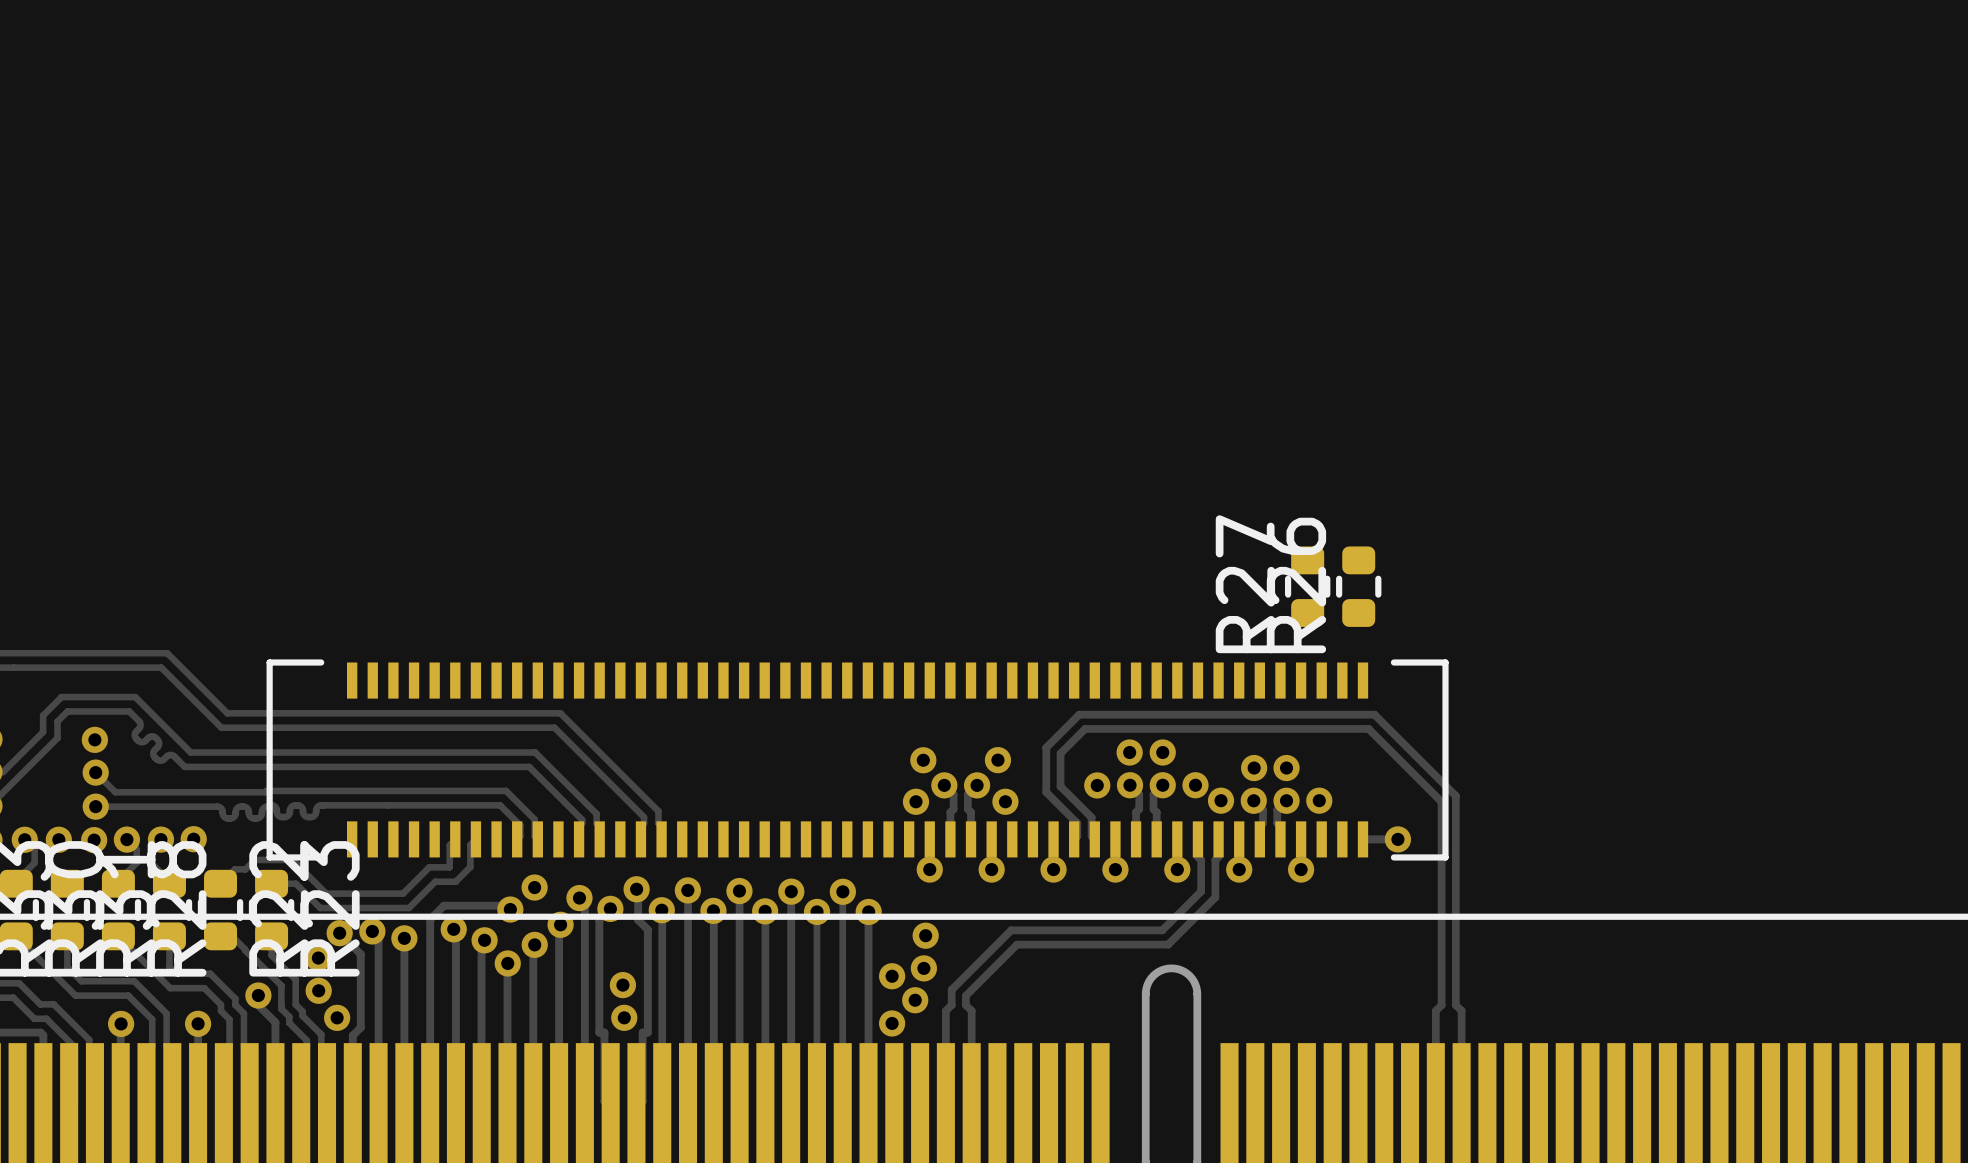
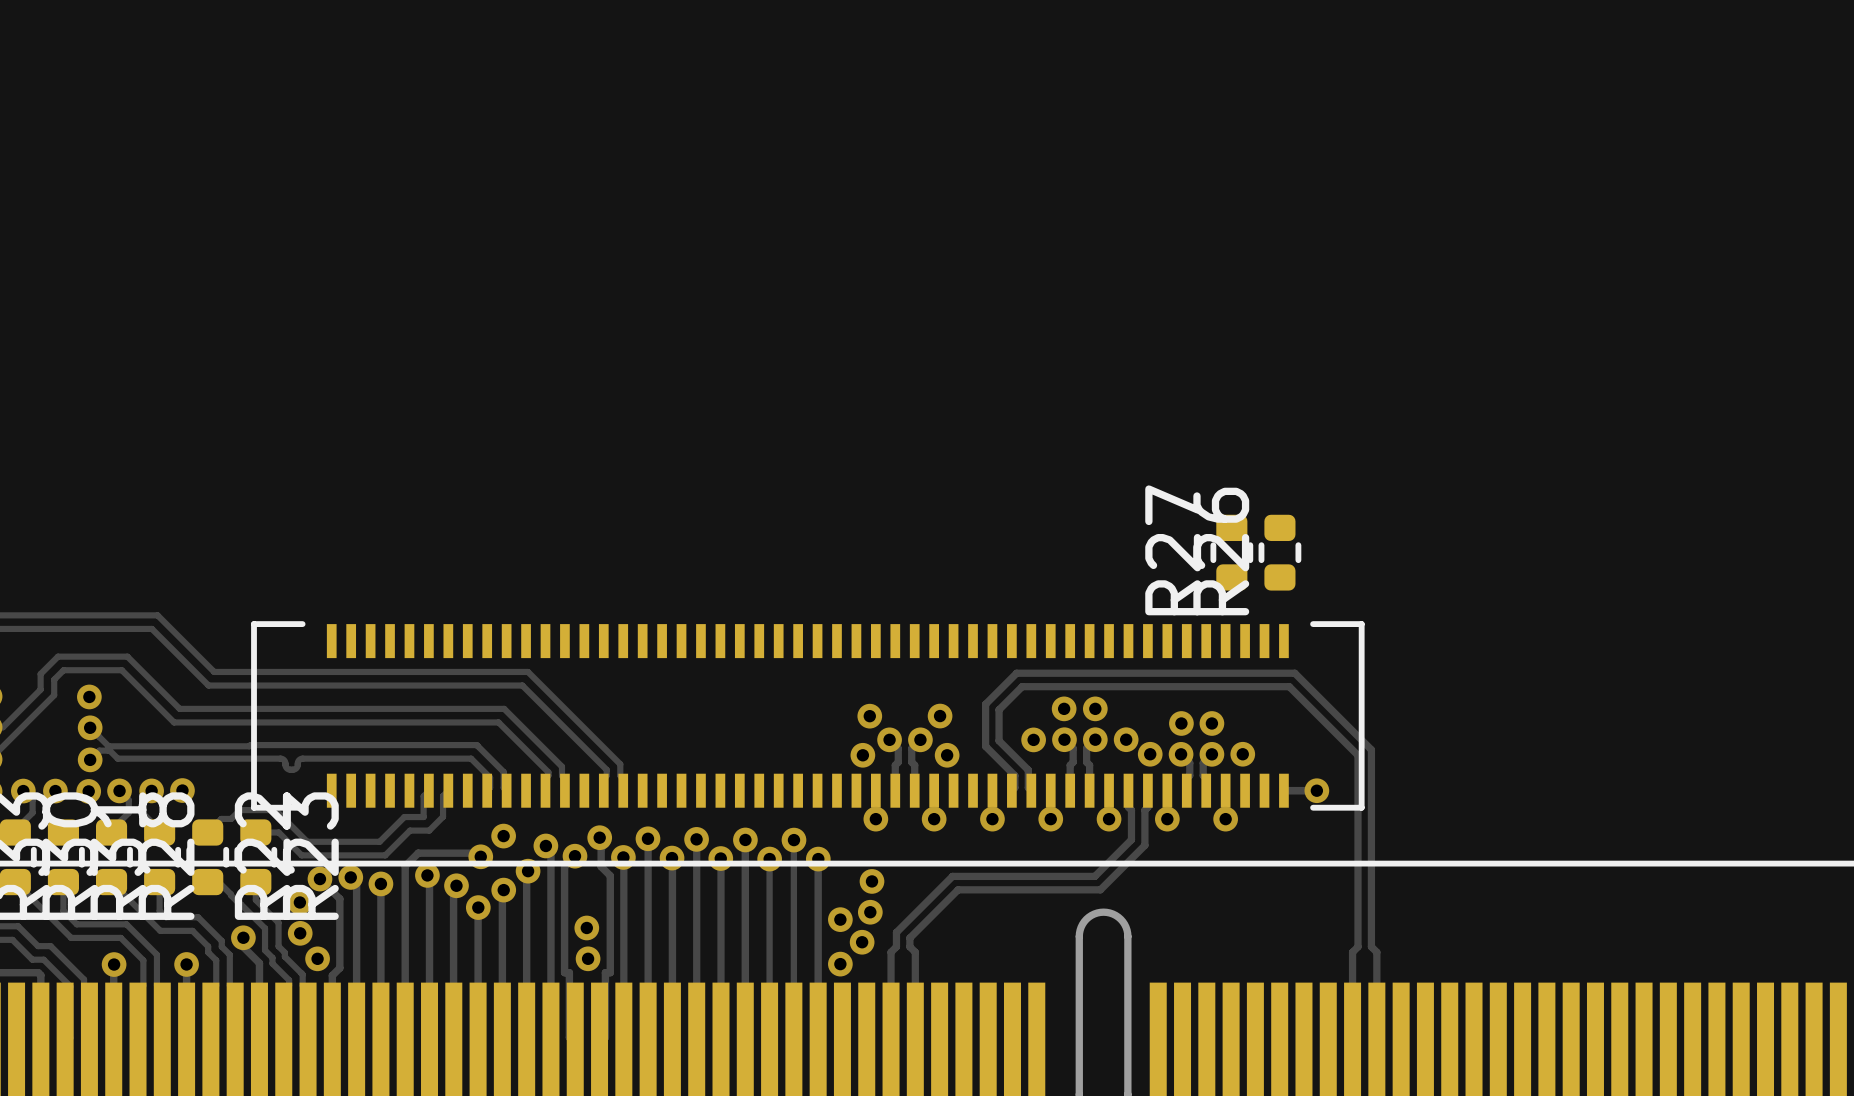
track: (139, 721) (140, 725) (135, 733) (136, 738) (141, 742) (150, 736) (155, 737) -> (131, 679) (146, 695)
track: (157, 739) (158, 745) (153, 753) (154, 757) (160, 760) (168, 755) (174, 756) -> (148, 696) (164, 712)
track: (297, 805) (291, 806) (289, 814) (284, 817) (278, 815) (274, 806) (265, 806) (262, 809) (260, 816) (256, 818) (250, 816) (248, 809) (244, 806) (237, 807) (234, 816) (227, 818) (223, 816) (221, 809) (218, 806) (95, 806) -> (280, 758) (117, 758) (109, 749) (99, 750) (90, 759)

